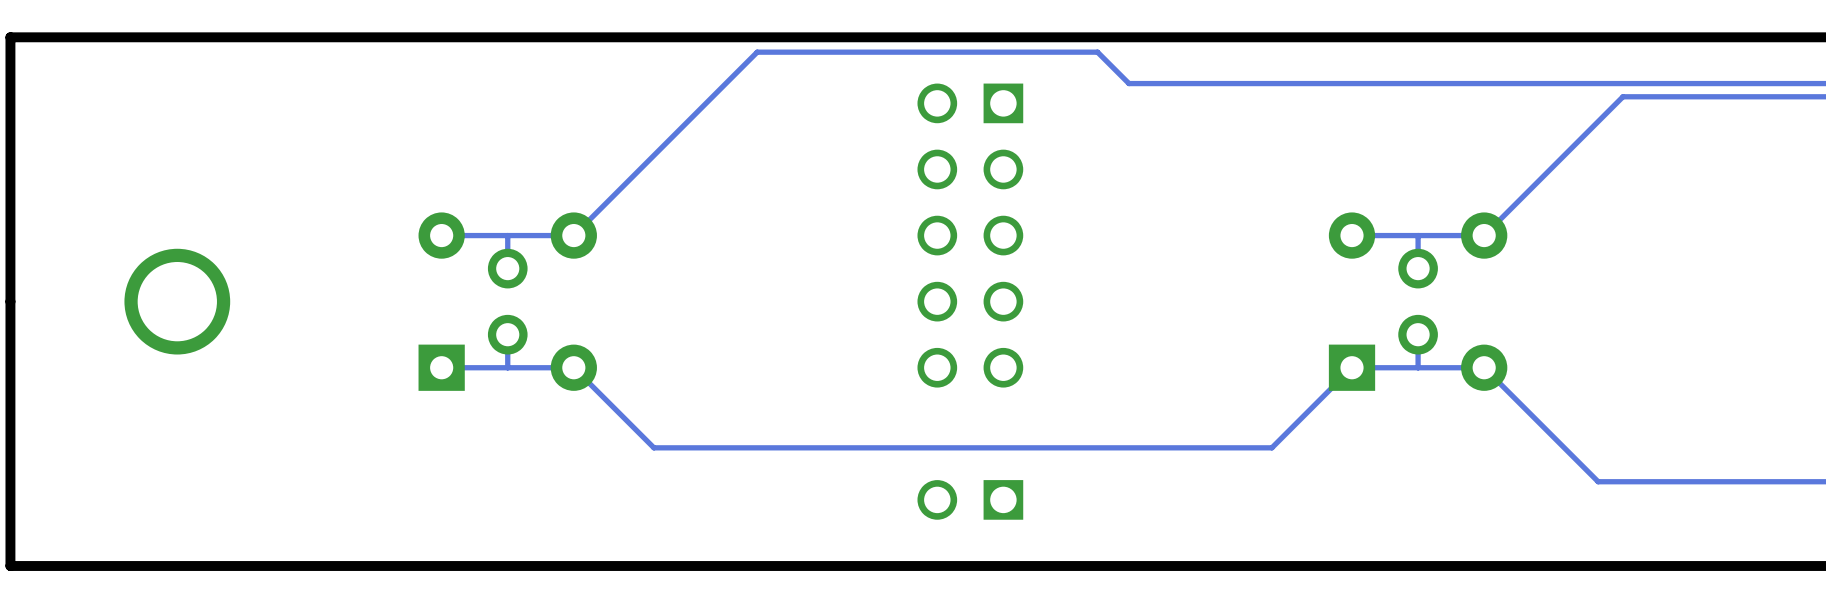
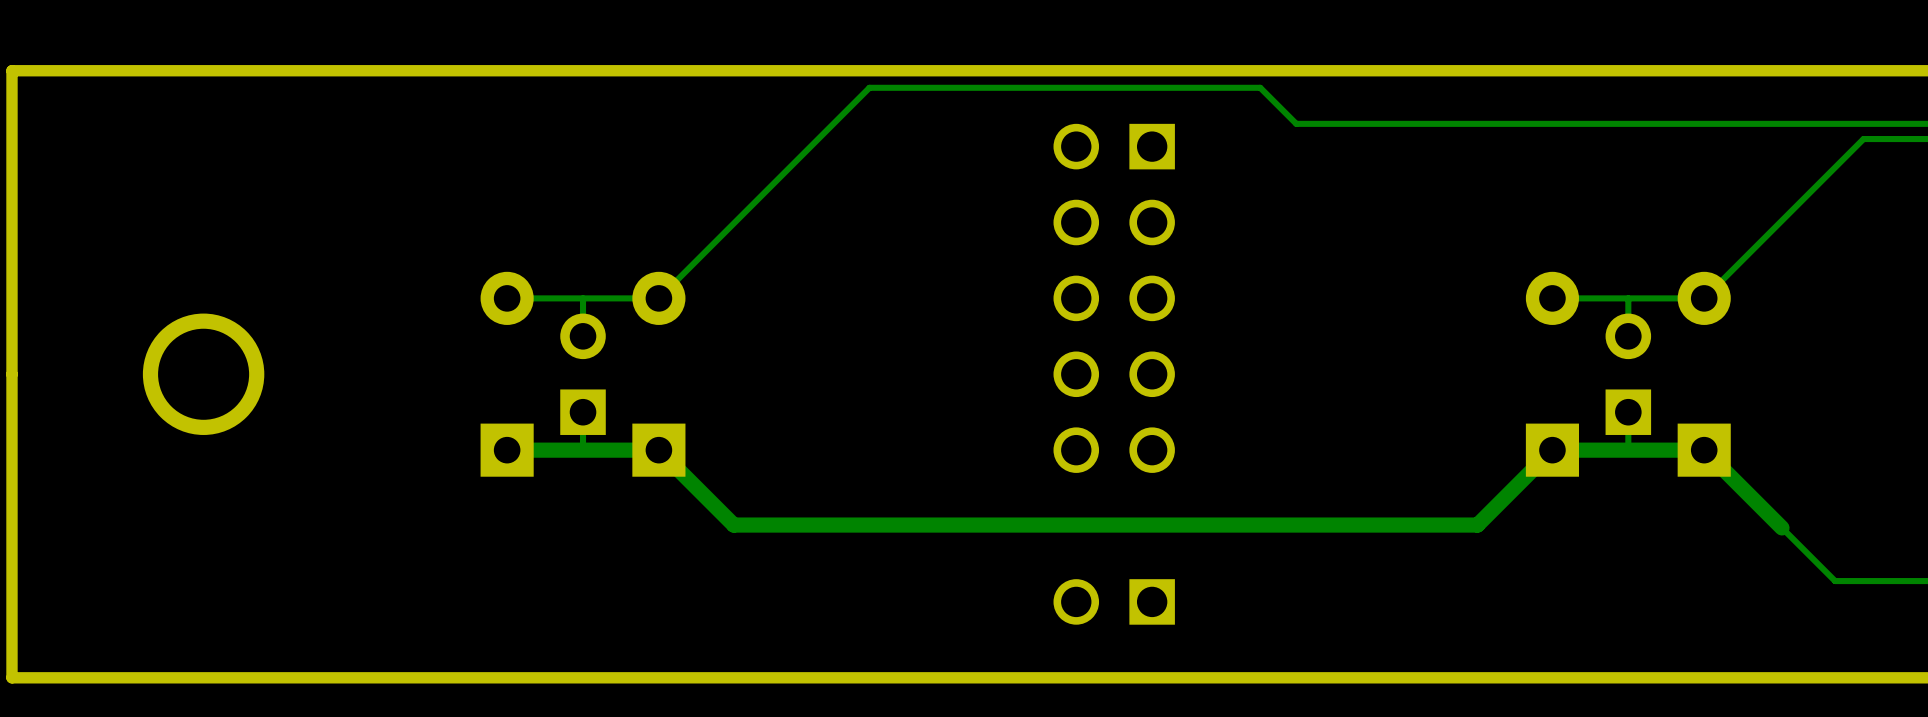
part footprint: [418, 212, 597, 391] -> [480, 271, 686, 477]
part footprint: [1328, 212, 1508, 391] -> [1525, 271, 1731, 477]
track width: thin (441, 367) (573, 367) (639, 432) -> thick (507, 450) (658, 450) (733, 525)
track: (1286, 432) (1271, 447) (653, 447) (639, 432) -> (1477, 525) (733, 525)
track width: thin (1286, 432) (1352, 367) (1484, 367) (1551, 435) -> thick (1477, 525) (1552, 450) (1704, 450) (1781, 527)

